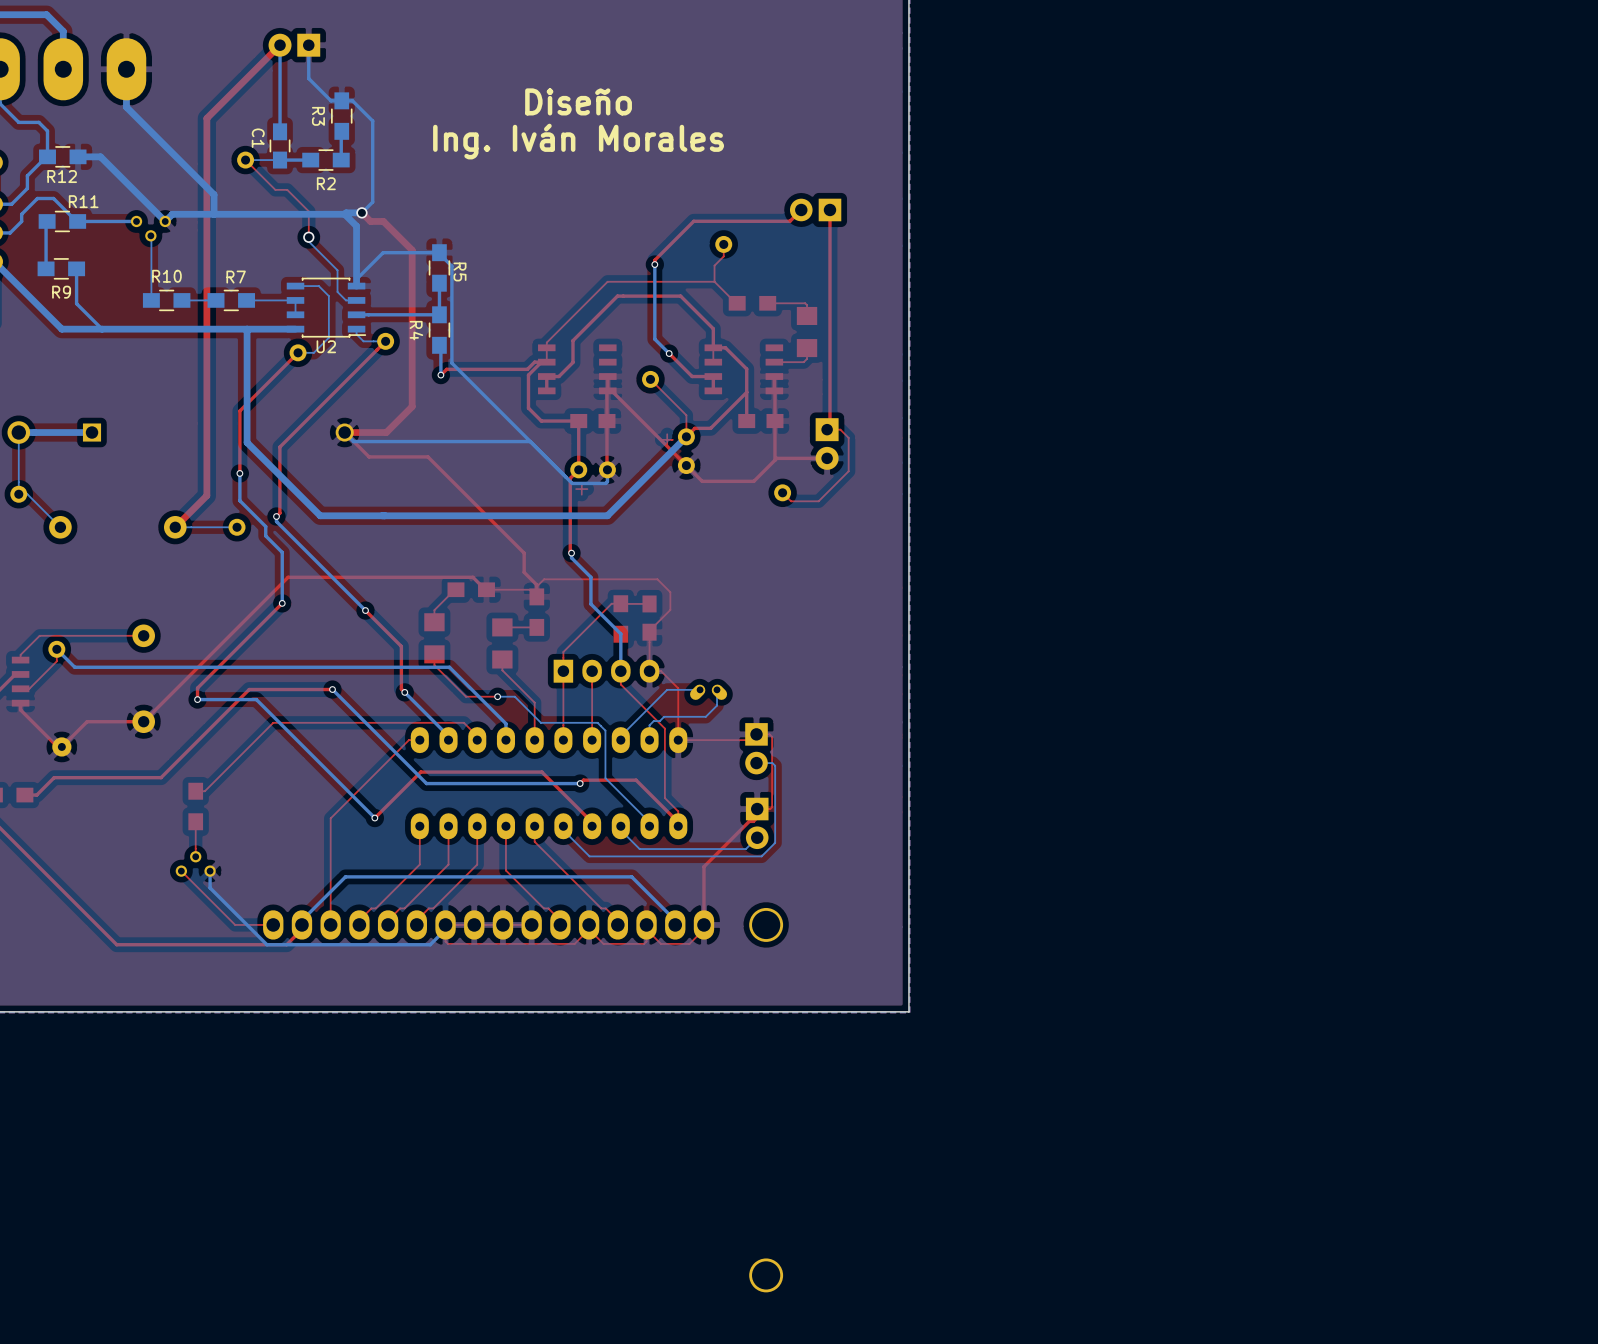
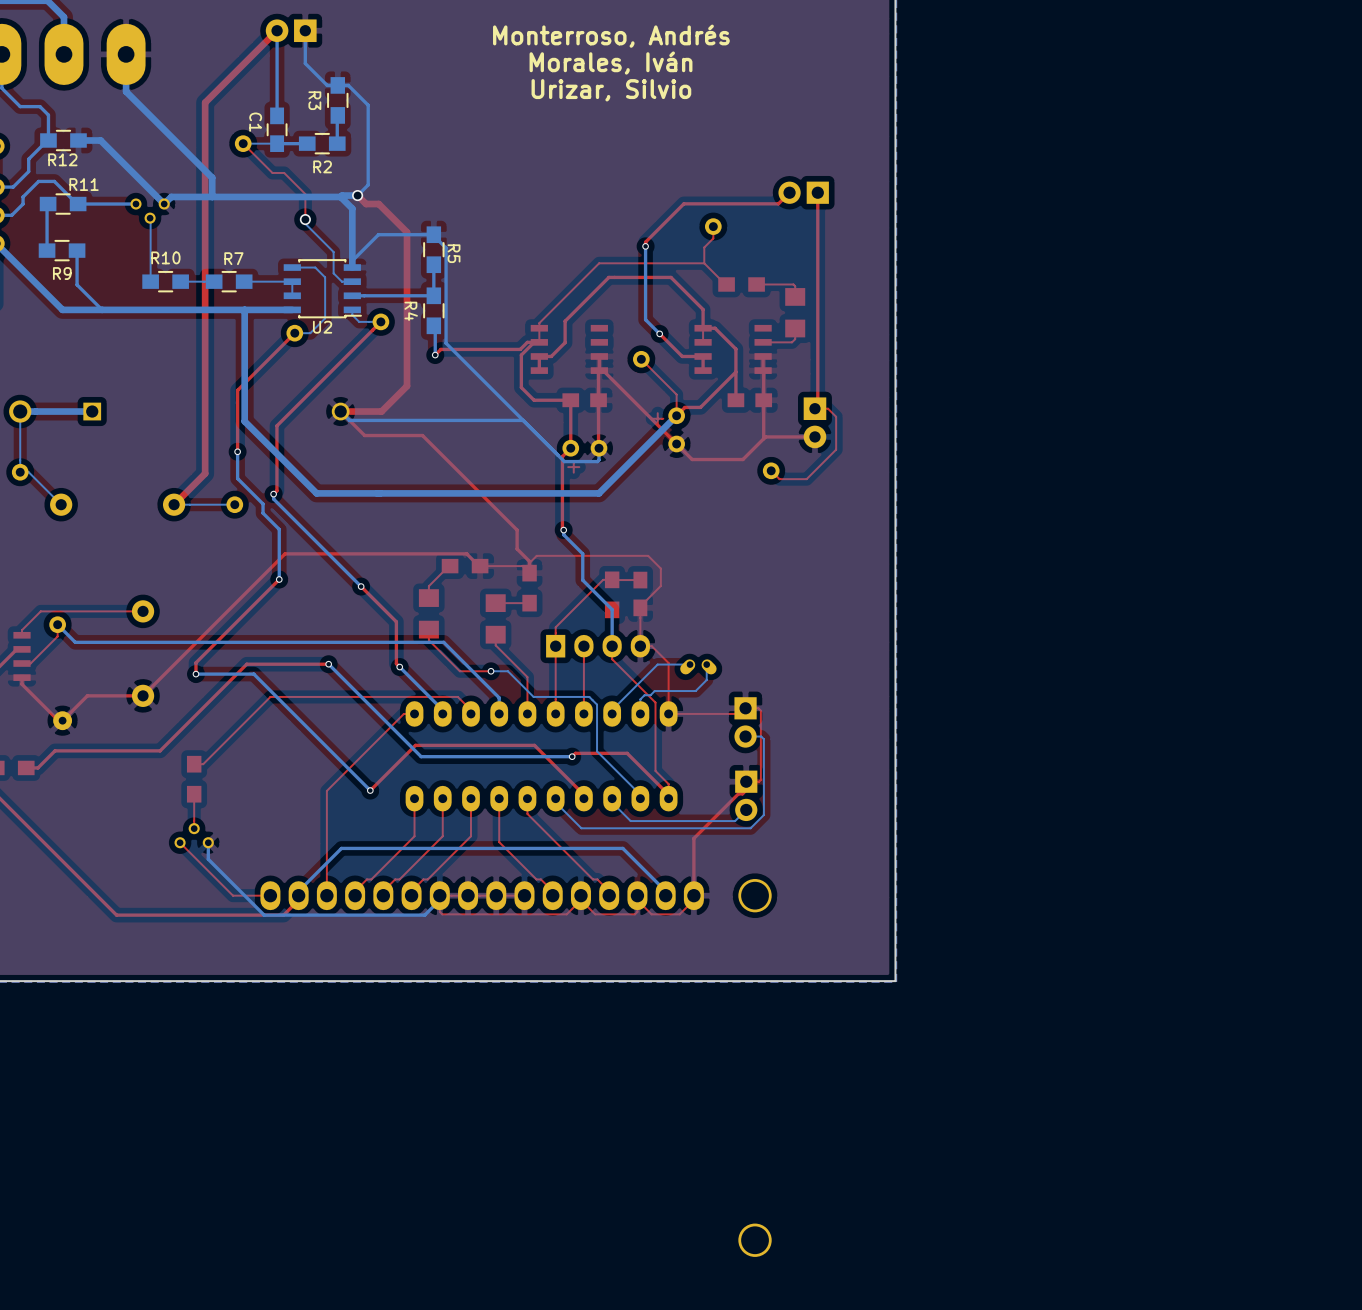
text: none -> Monterroso, Andrés (611, 36)
text: none -> Morales, Iván (610, 63)
text: Diseño (578, 101) -> none
text: none -> Urizar, Silvio (611, 90)
text: Ing. Iván Morales (578, 141) -> none

